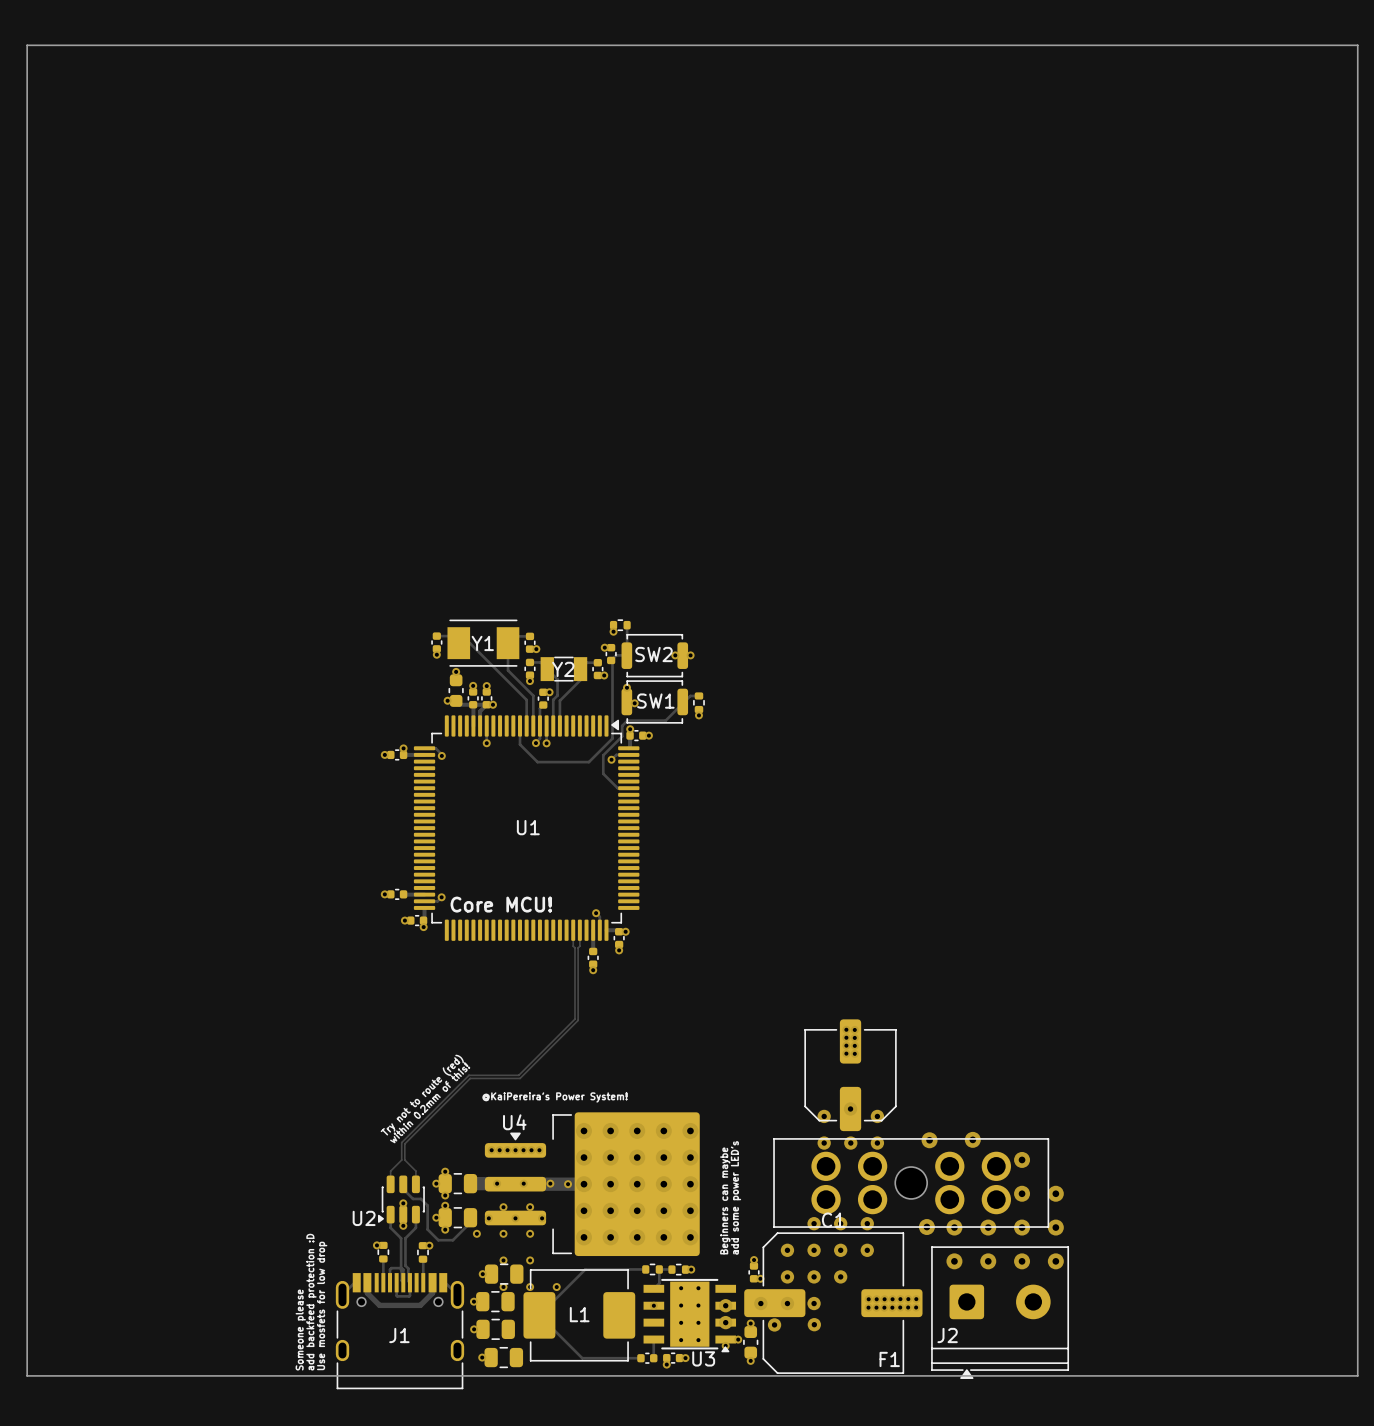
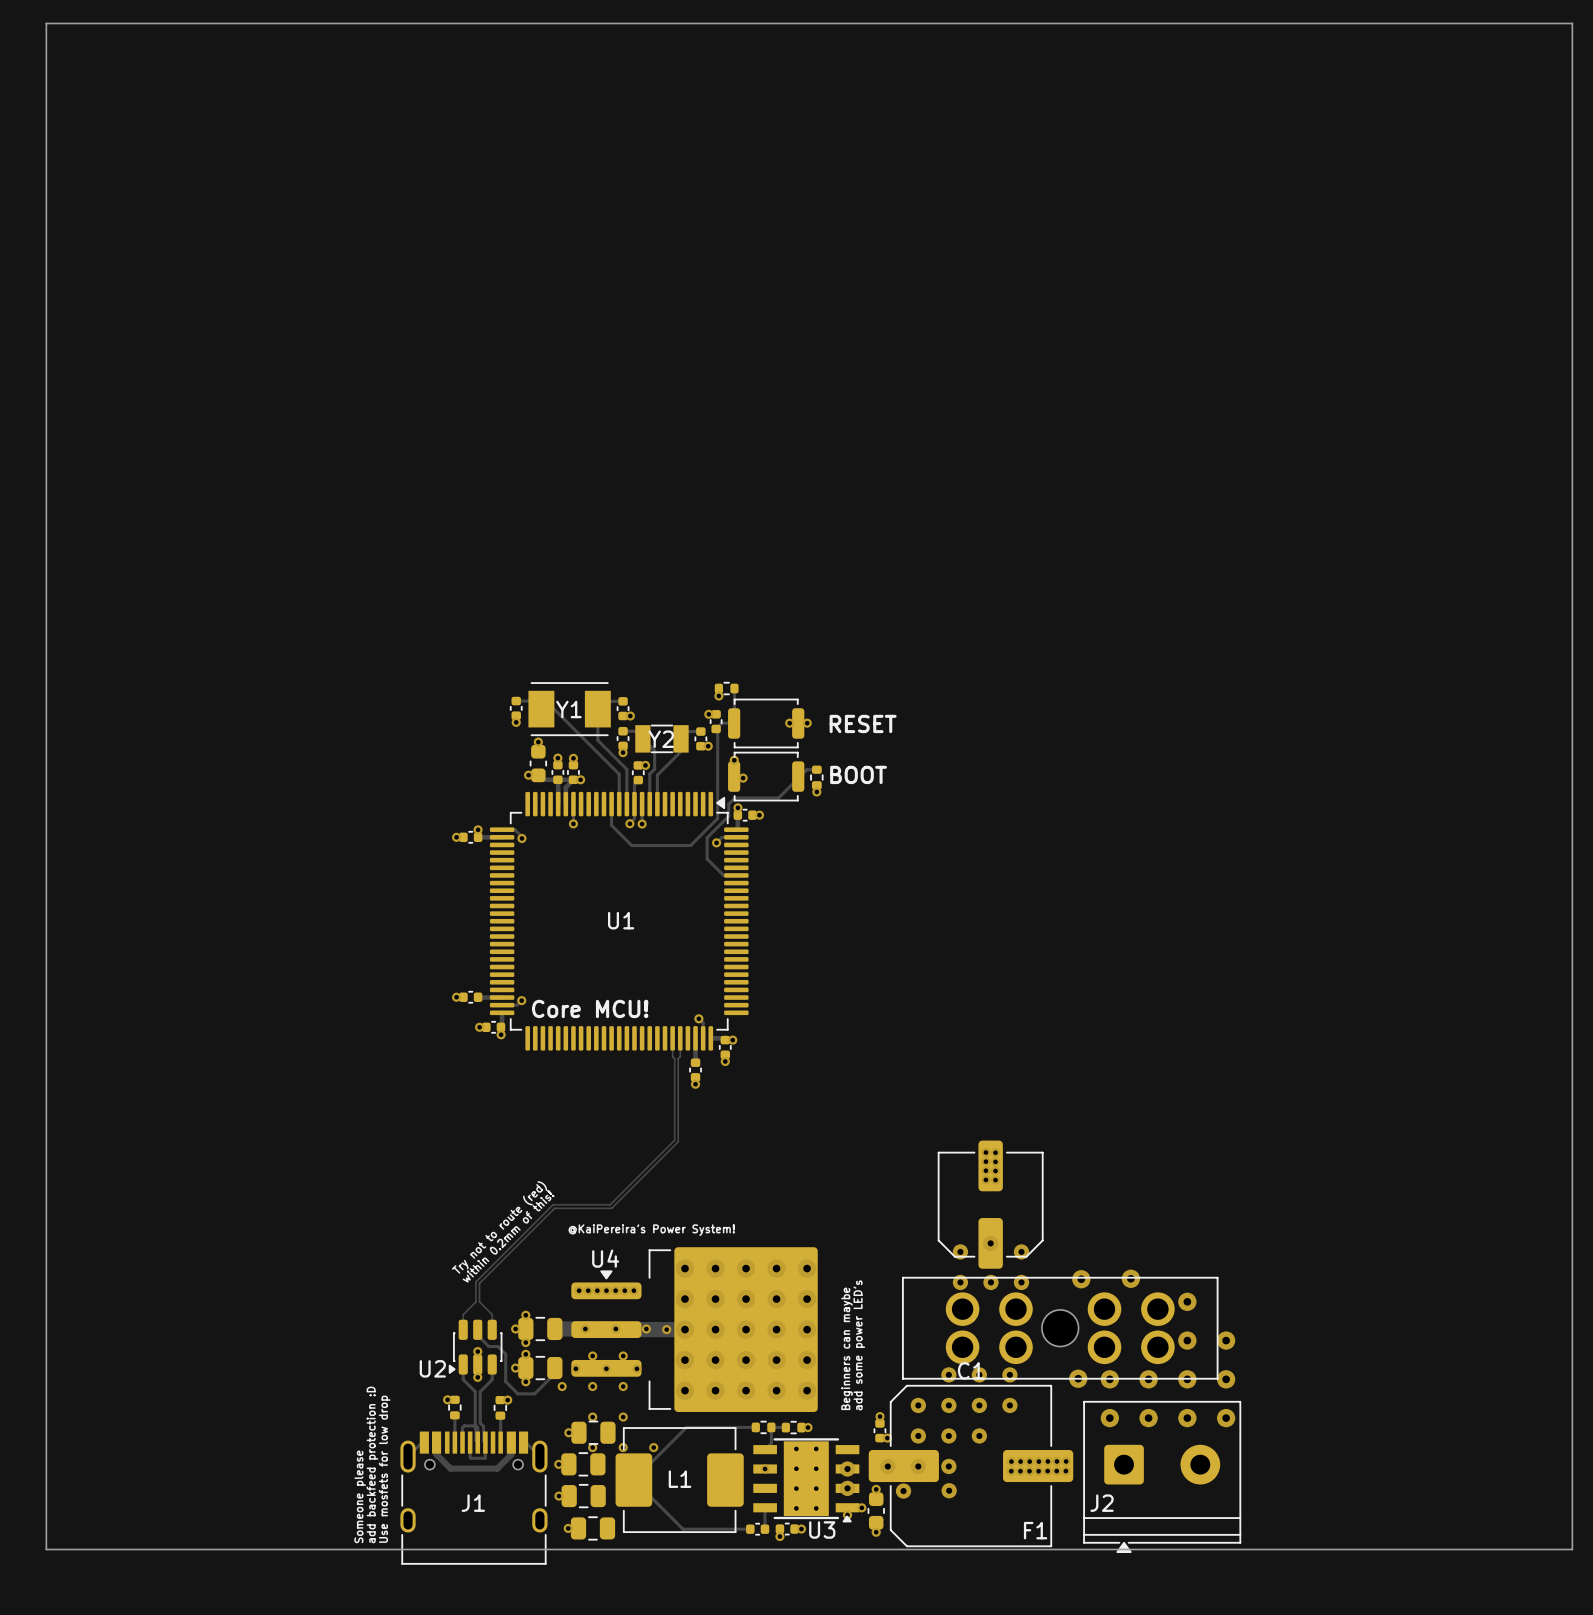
SW2 name: SW2 (653, 654) -> BOOT (858, 774)
SW1 name: SW1 (655, 701) -> RESET (863, 723)

